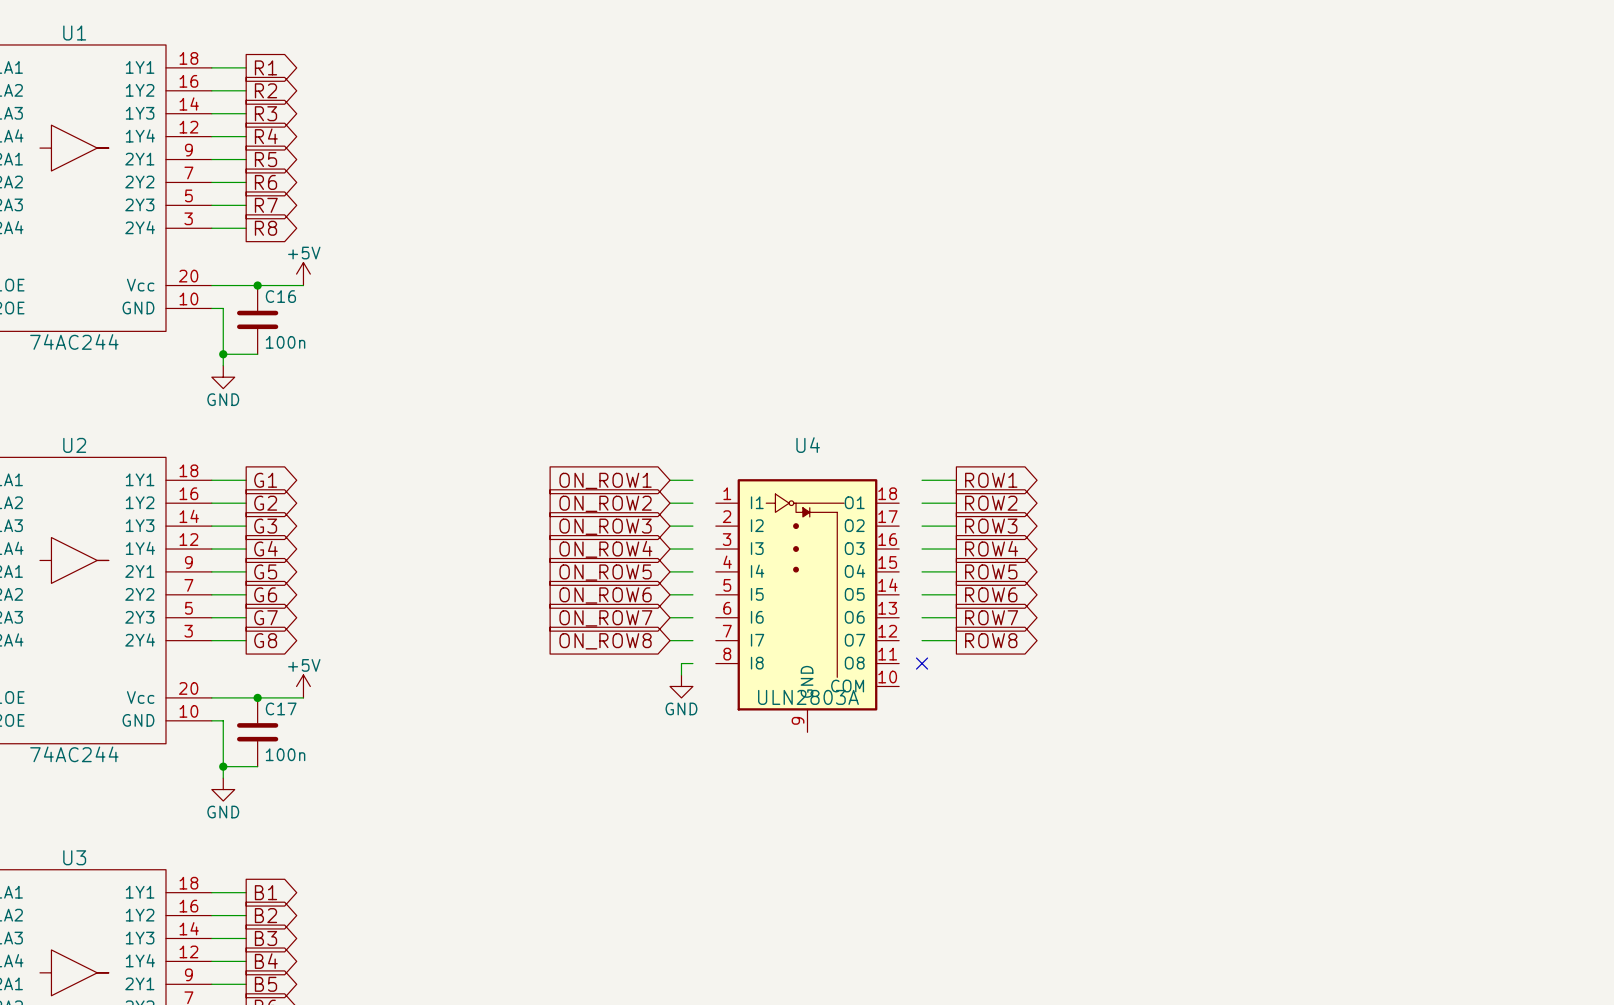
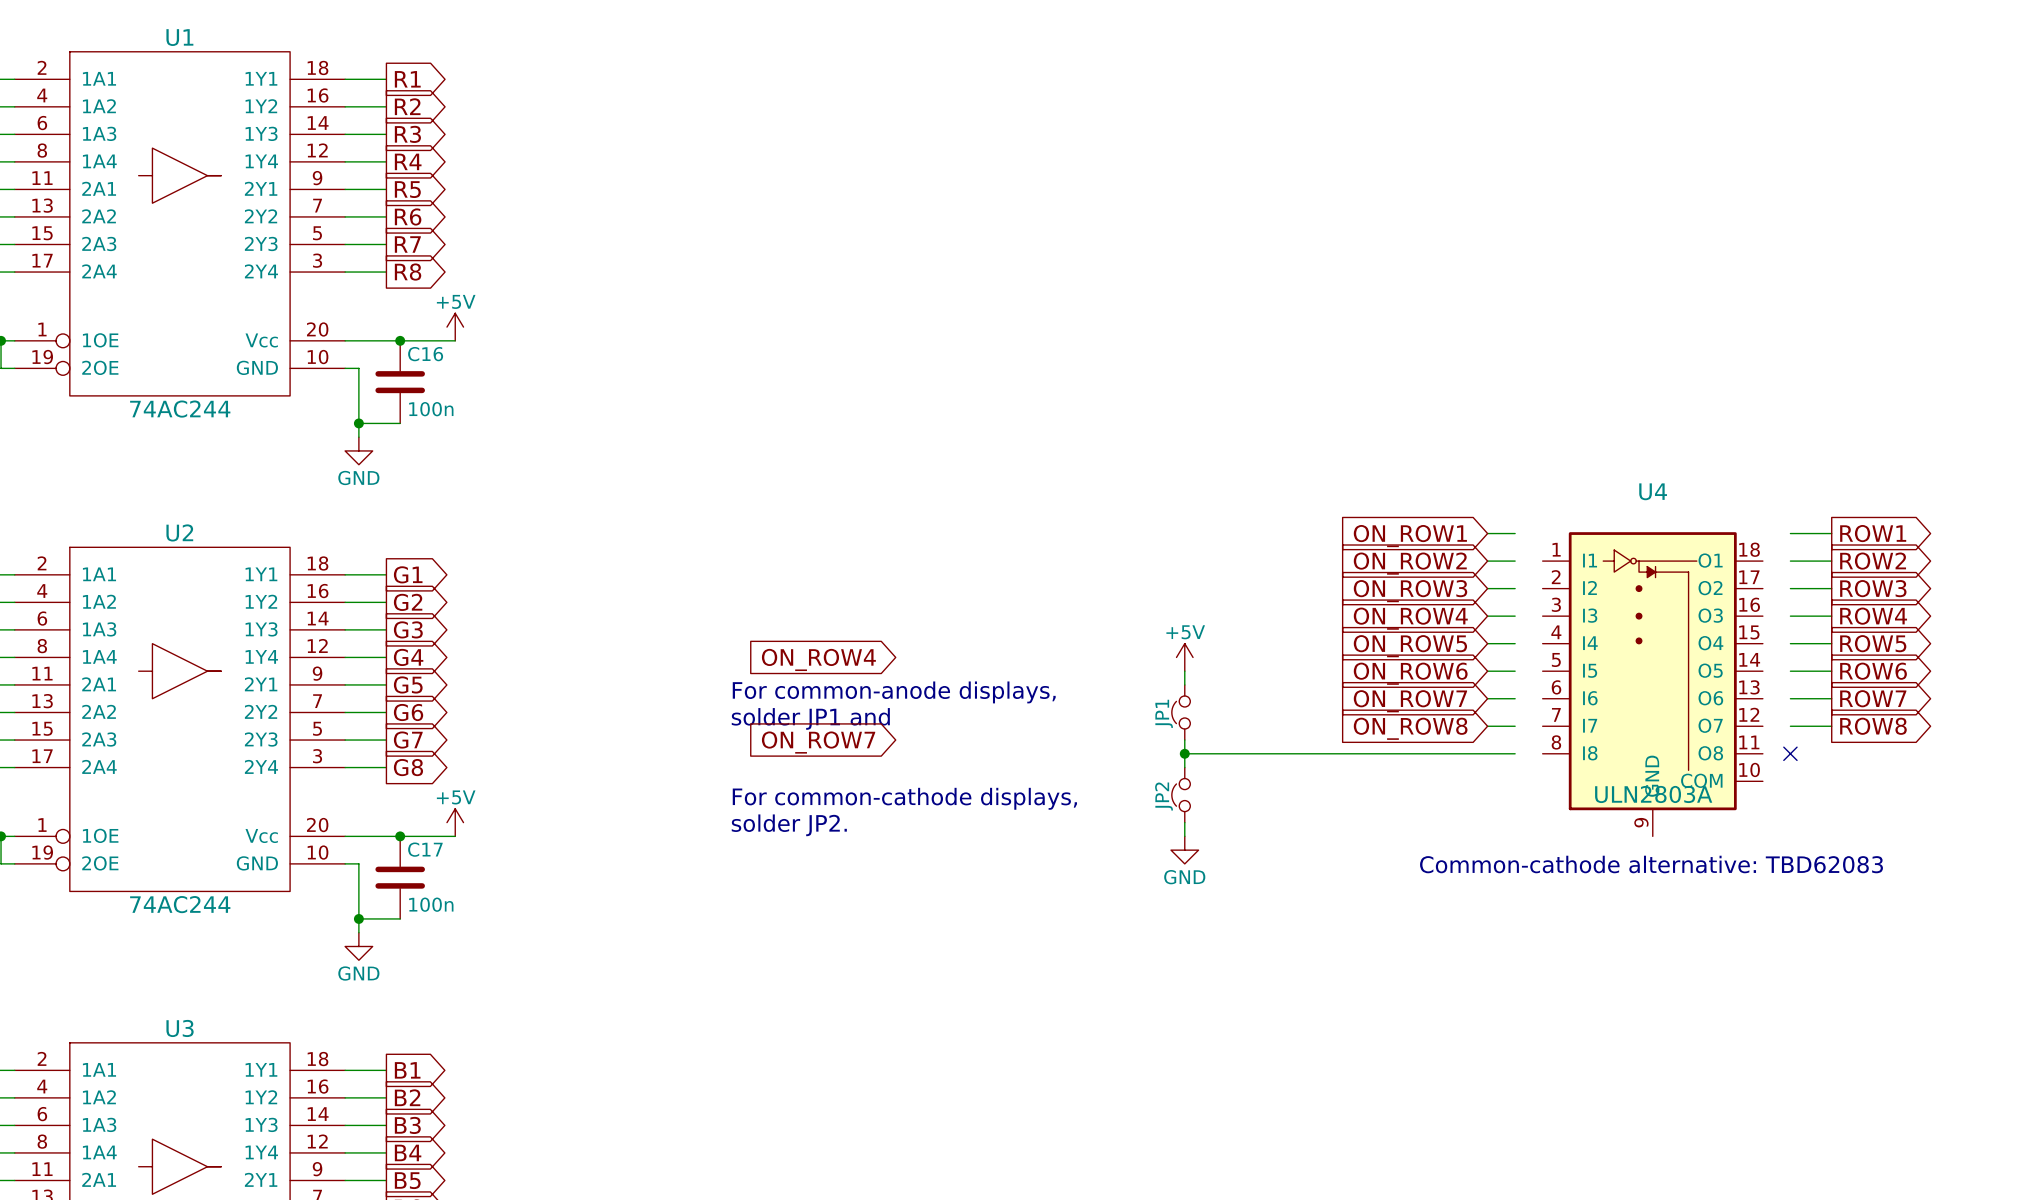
wire: none -> (1487, 533) (1515, 533)
wire: none -> (1790, 533) (1831, 533)
global label: none -> ROW1 (1873, 533)
global label: none -> ON_ROW1 (1410, 536)
wire: none -> (1487, 561) (1515, 561)
wire: none -> (1790, 561) (1831, 561)
global label: none -> ROW2 (1873, 561)
global label: none -> ON_ROW2 (1410, 563)
global label: ON_ROW1 (605, 480) -> none
wire: (670, 480) (692, 480) -> none
wire: (922, 480) (956, 480) -> none
global label: ROW1 (991, 480) -> none
wire: none -> (1487, 588) (1515, 588)
wire: none -> (1790, 588) (1831, 588)
global label: none -> ROW3 (1873, 588)
global label: none -> ON_ROW3 (1410, 591)
global label: ON_ROW2 (605, 503) -> none
wire: (670, 503) (692, 503) -> none
wire: (922, 503) (956, 503) -> none
global label: ROW2 (991, 503) -> none
global label: none -> ON_ROW4 (1410, 618)
wire: none -> (1487, 616) (1515, 616)
wire: none -> (1790, 616) (1831, 616)
global label: none -> ROW4 (1873, 616)
global label: ON_ROW3 (605, 526) -> none
wire: (670, 526) (692, 526) -> none
wire: (922, 526) (956, 526) -> none
global label: ROW3 (991, 526) -> none
wire: none -> (1487, 643) (1515, 643)
wire: none -> (1790, 643) (1831, 643)
global label: none -> ROW5 (1873, 643)
global label: none -> ON_ROW5 (1410, 646)
global label: ROW4 (991, 548) -> none
wire: (670, 549) (692, 549) -> none
power symbol: none -> +5V (1184, 657)
wire: (922, 549) (956, 549) -> none
wire: none -> (1184, 671) (1184, 684)
wire: none -> (1487, 671) (1515, 671)
wire: none -> (1790, 671) (1831, 671)
global label: none -> ROW6 (1873, 671)
global label: none -> ON_ROW6 (1410, 673)
wire: (670, 571) (692, 571) -> none
wire: (922, 571) (956, 571) -> none
global label: ROW5 (991, 571) -> none
global label: ON_ROW5 (605, 572) -> none
text: none -> For common-anode displays, (894, 692)
wire: none -> (1487, 698) (1515, 698)
wire: none -> (1790, 698) (1831, 698)
global label: none -> ROW7 (1873, 698)
global label: none -> ON_ROW7 (1410, 701)
wire: (670, 594) (692, 594) -> none
JP1: none -> (1181, 712)
wire: (922, 594) (956, 594) -> none
global label: ROW6 (991, 594) -> none
global label: ON_ROW6 (605, 595) -> none
text: none -> solder JP1 and (810, 718)
U4 position: (807, 605) -> (1652, 684)
global label: none -> ON_ROW8 (1410, 728)
wire: none -> (1487, 726) (1515, 726)
wire: none -> (1790, 726) (1831, 726)
global label: none -> ROW8 (1873, 726)
wire: (670, 617) (692, 617) -> none
wire: none -> (1184, 740) (1184, 767)
wire: (922, 617) (956, 617) -> none
global label: ROW7 (991, 617) -> none
wire: none -> (1184, 753) (1515, 753)
junction: none -> (1184, 753)
no-connect mark: none -> (1790, 753)
wire: (670, 640) (692, 640) -> none
wire: (922, 640) (956, 640) -> none
global label: ROW8 (991, 640) -> none
global label: ON_ROW8 (605, 641) -> none
wire: (692, 663) (681, 663) (681, 675) -> none
JP2: none -> (1181, 795)
no-connect mark: (922, 663) -> none
text: none -> For common-cathode displays, (904, 798)
power symbol: GND (681, 686) -> none
wire: none -> (1184, 822) (1184, 836)
text: none -> solder JP2. (789, 825)
power symbol: none -> GND (1184, 850)
text: none -> Common-cathode alternative: TBD62083 (1651, 864)

